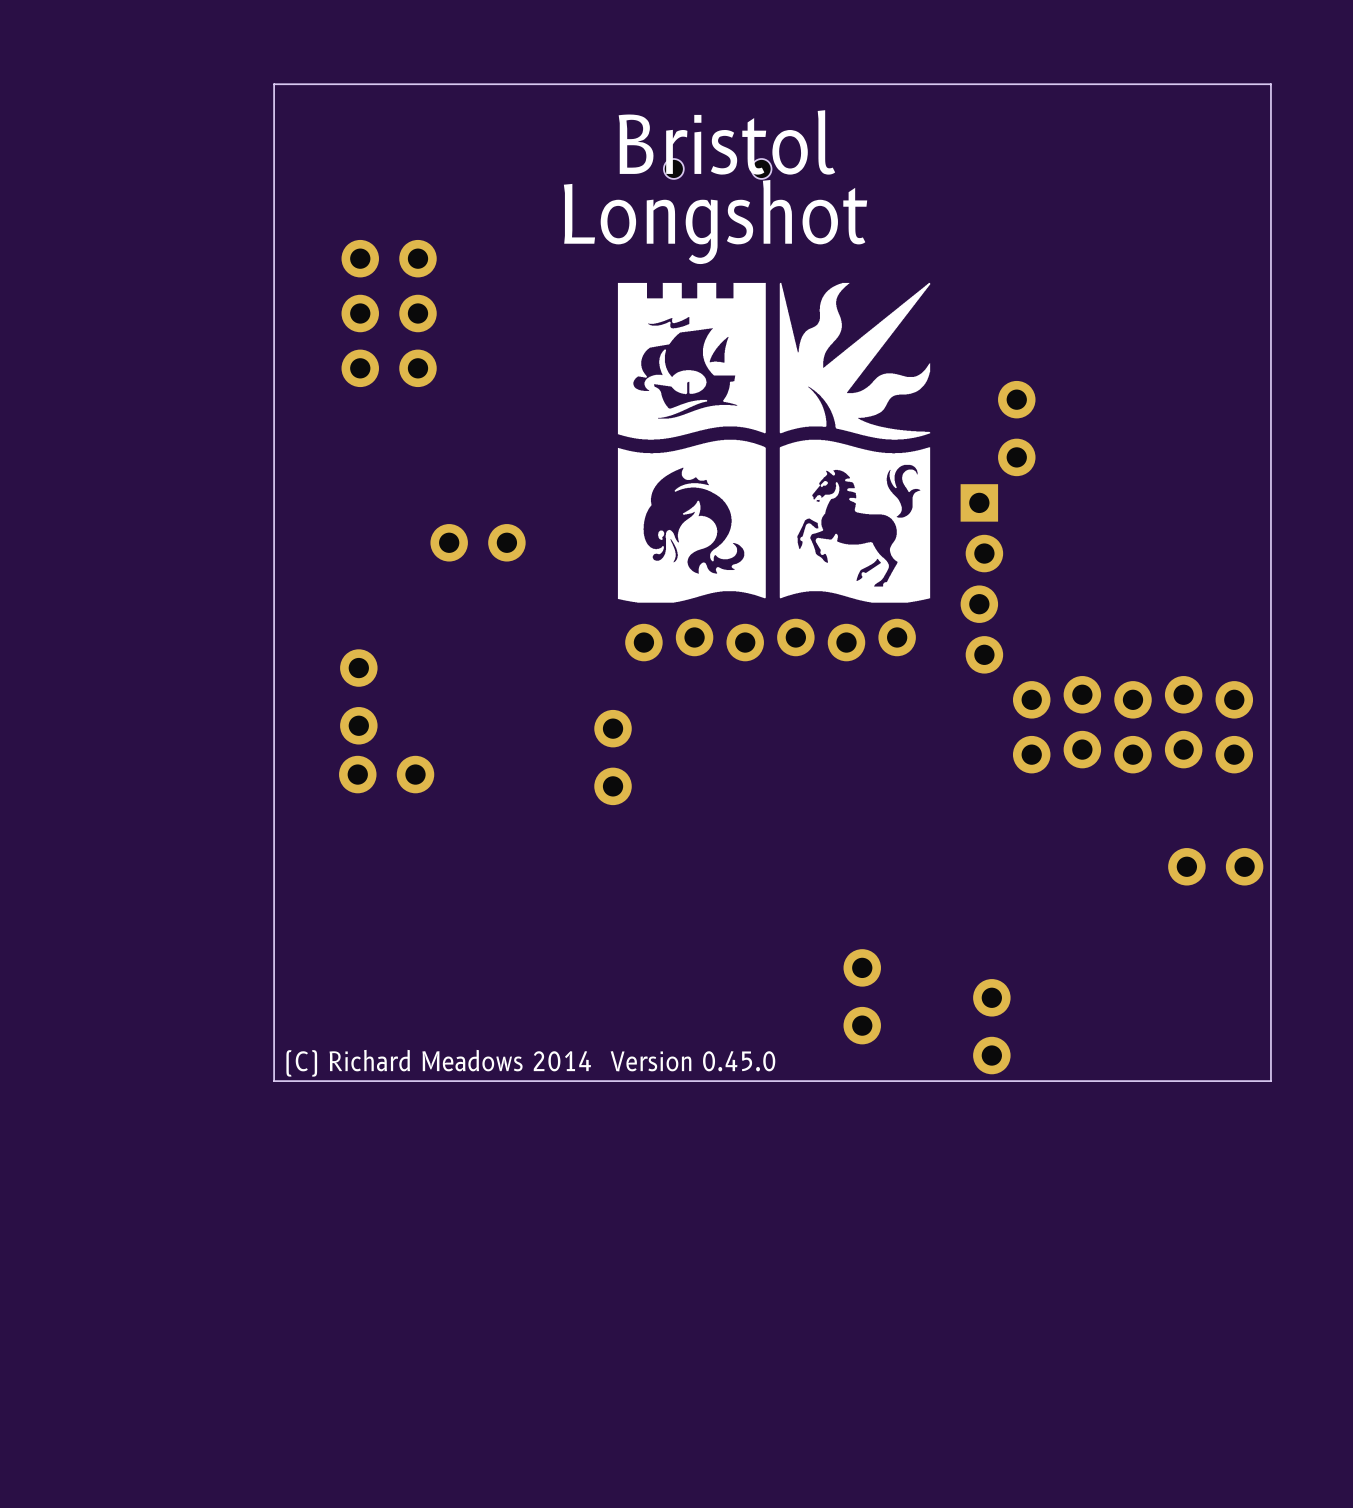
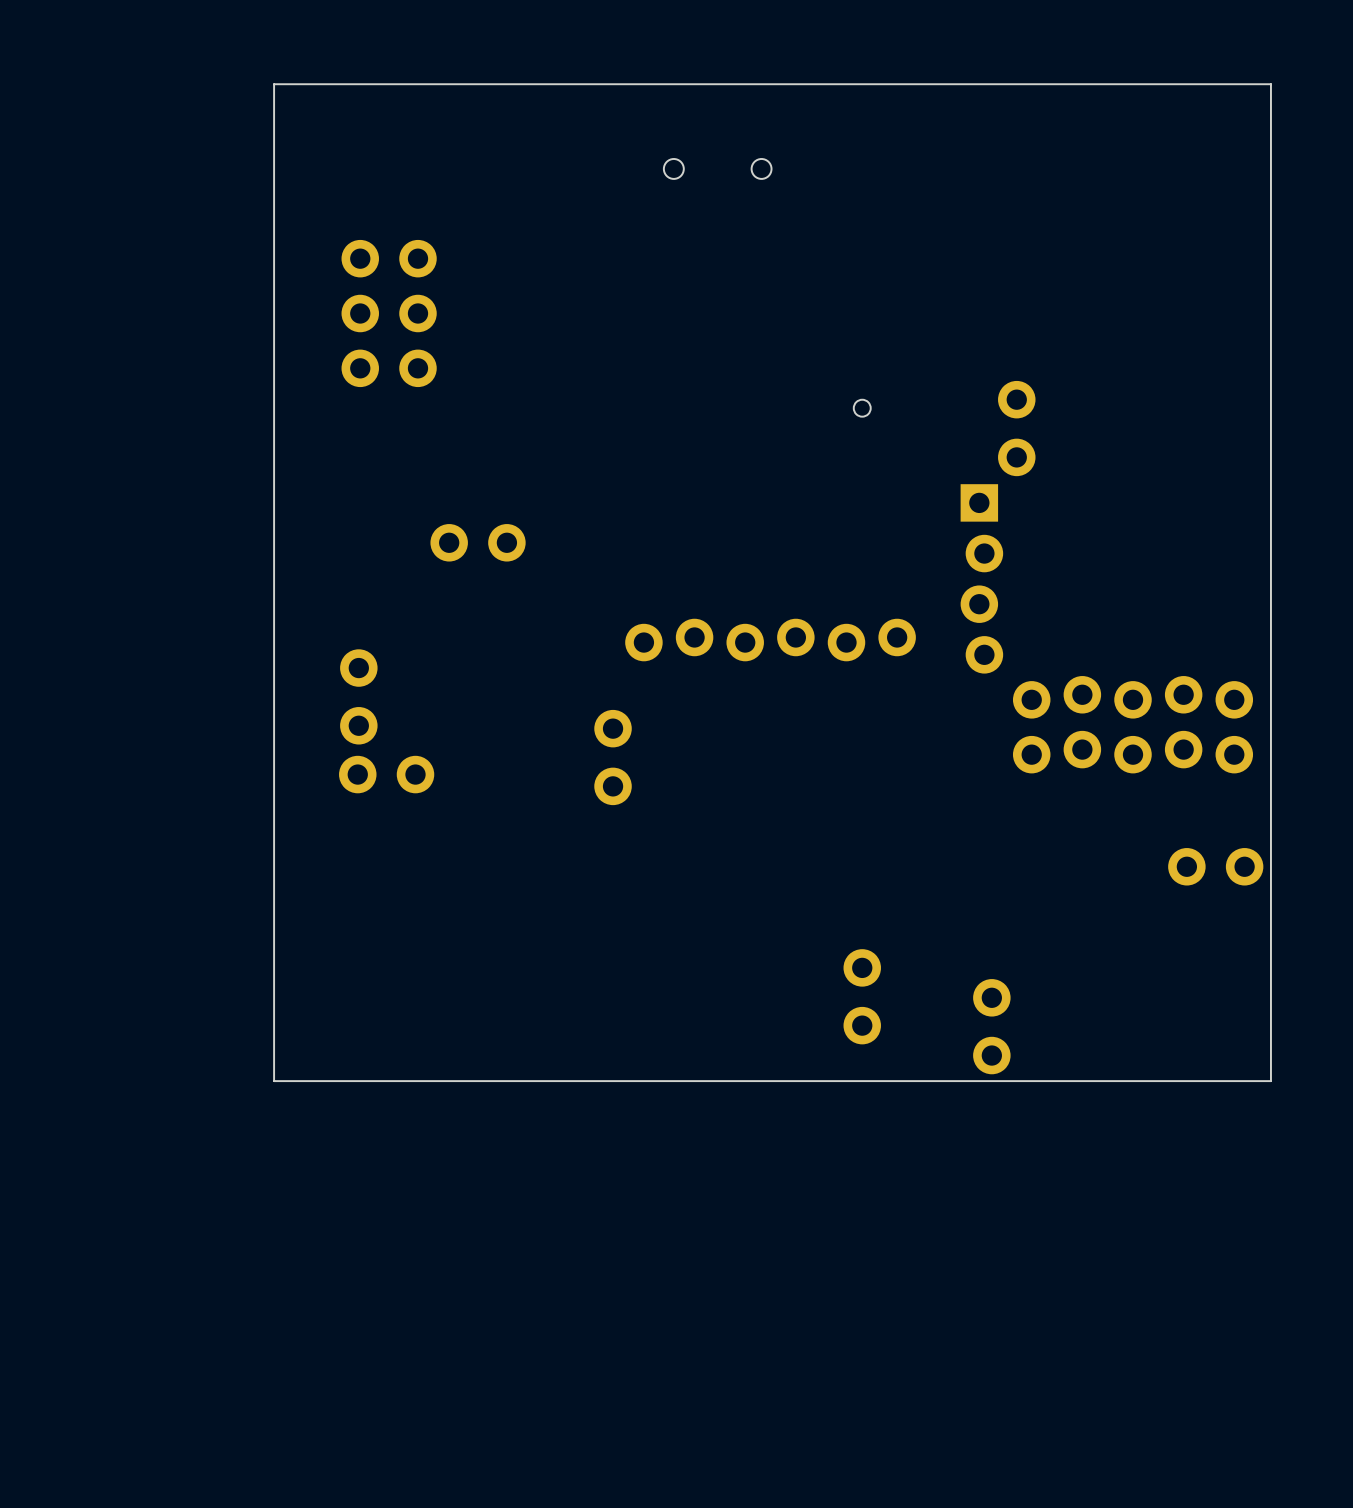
text: Bristol (726, 142) -> none
text: Longshot (715, 222) -> none
drawing: [617, 282, 931, 603] -> none
text: (C) Richard Meadows 2014 Version 0.45.0 (530, 1063) -> none

